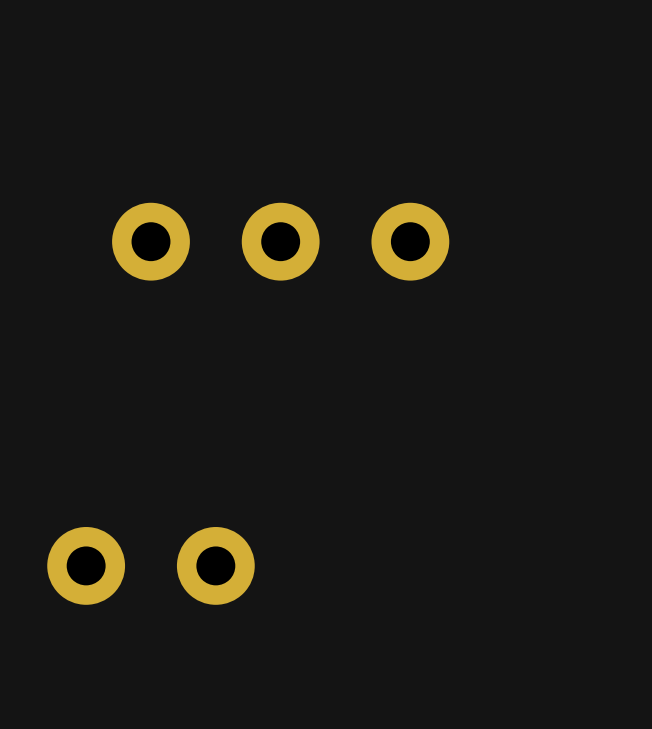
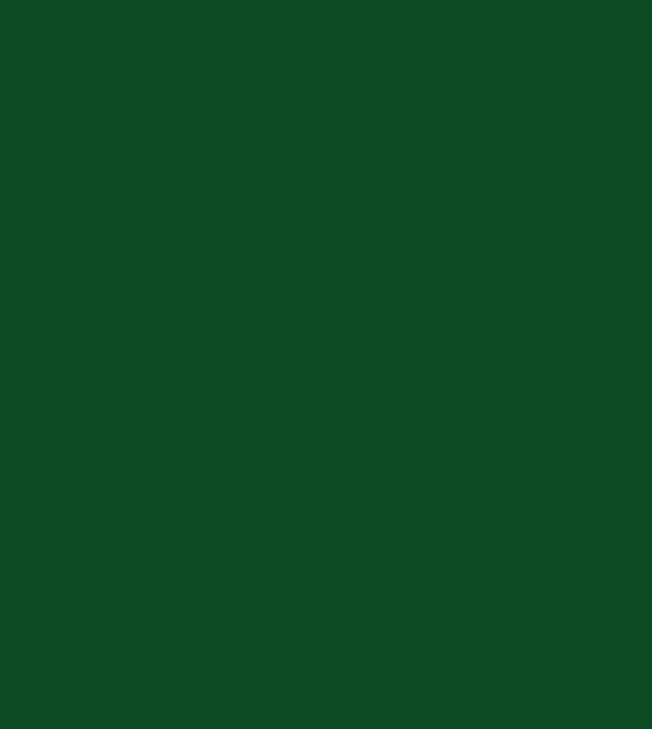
part: (280, 241) -> none
part: (150, 565) -> none

